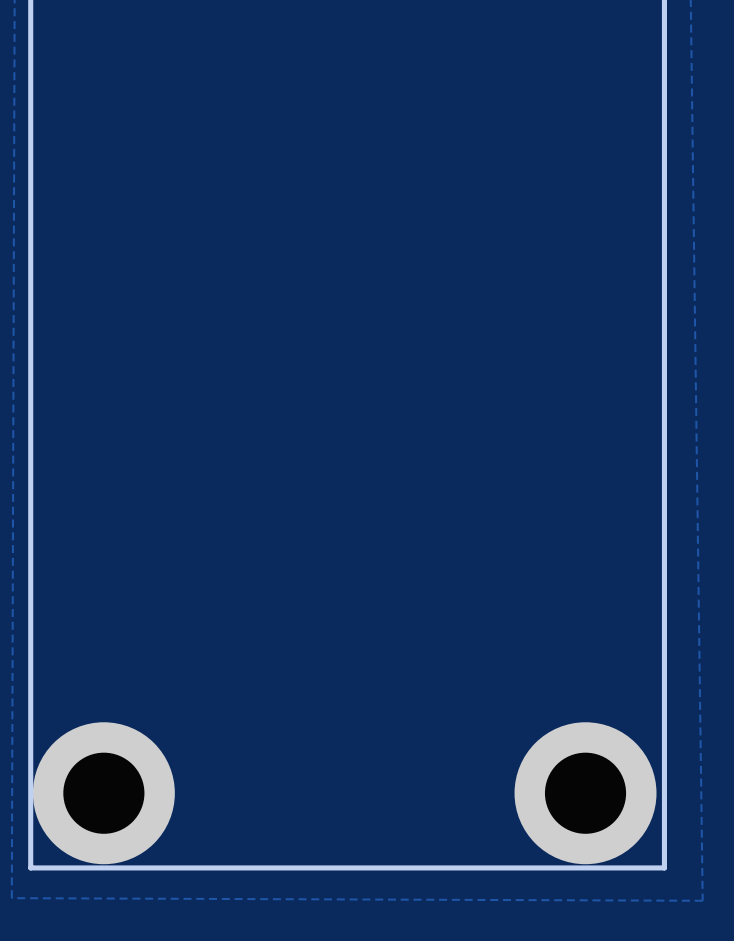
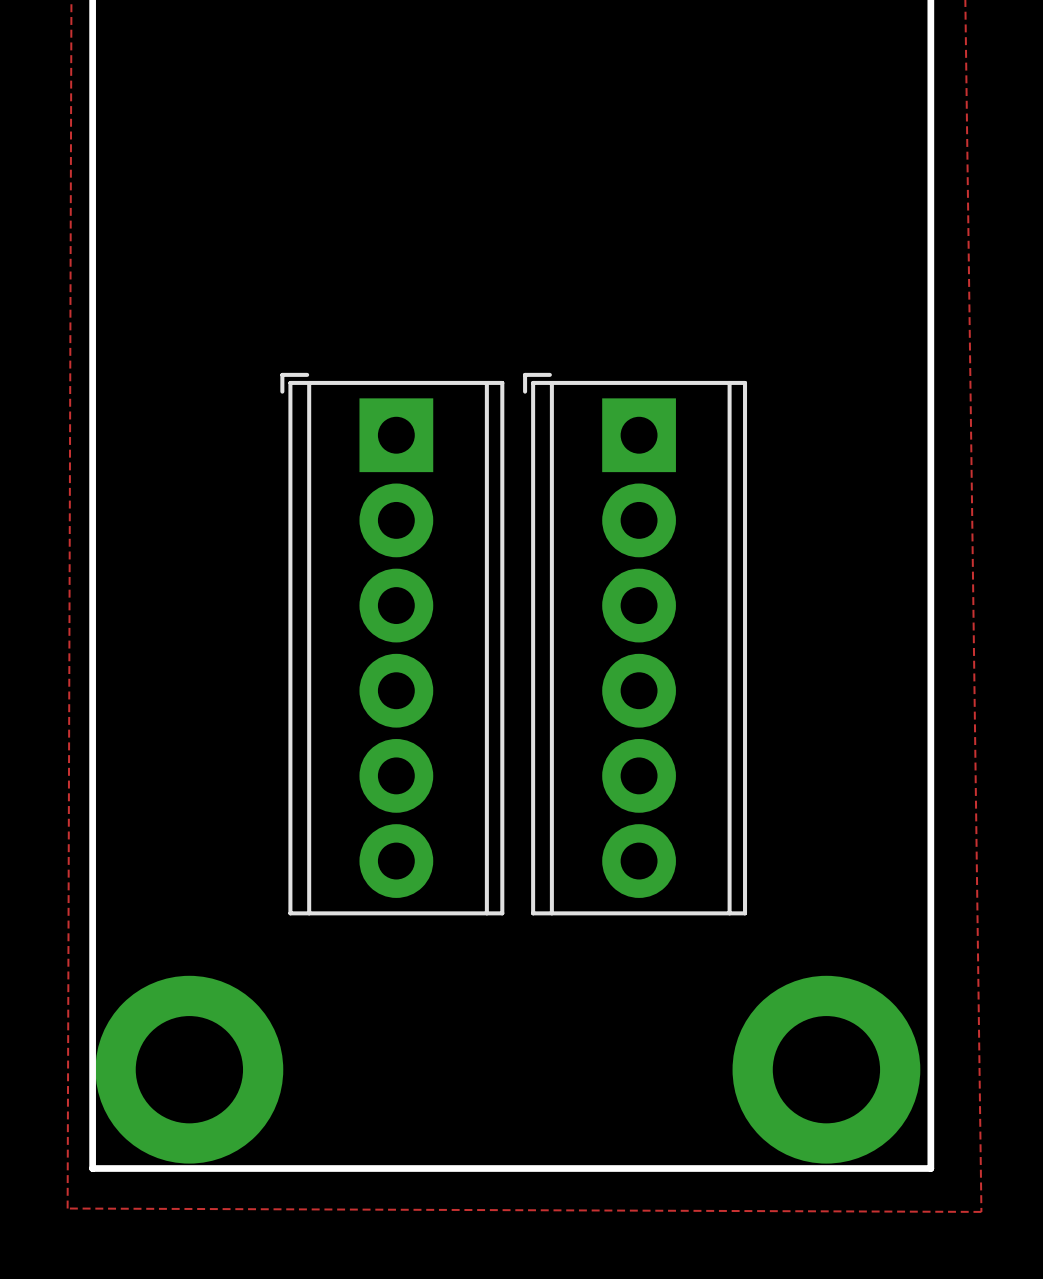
part: none -> (392, 644)
part: none -> (635, 644)

